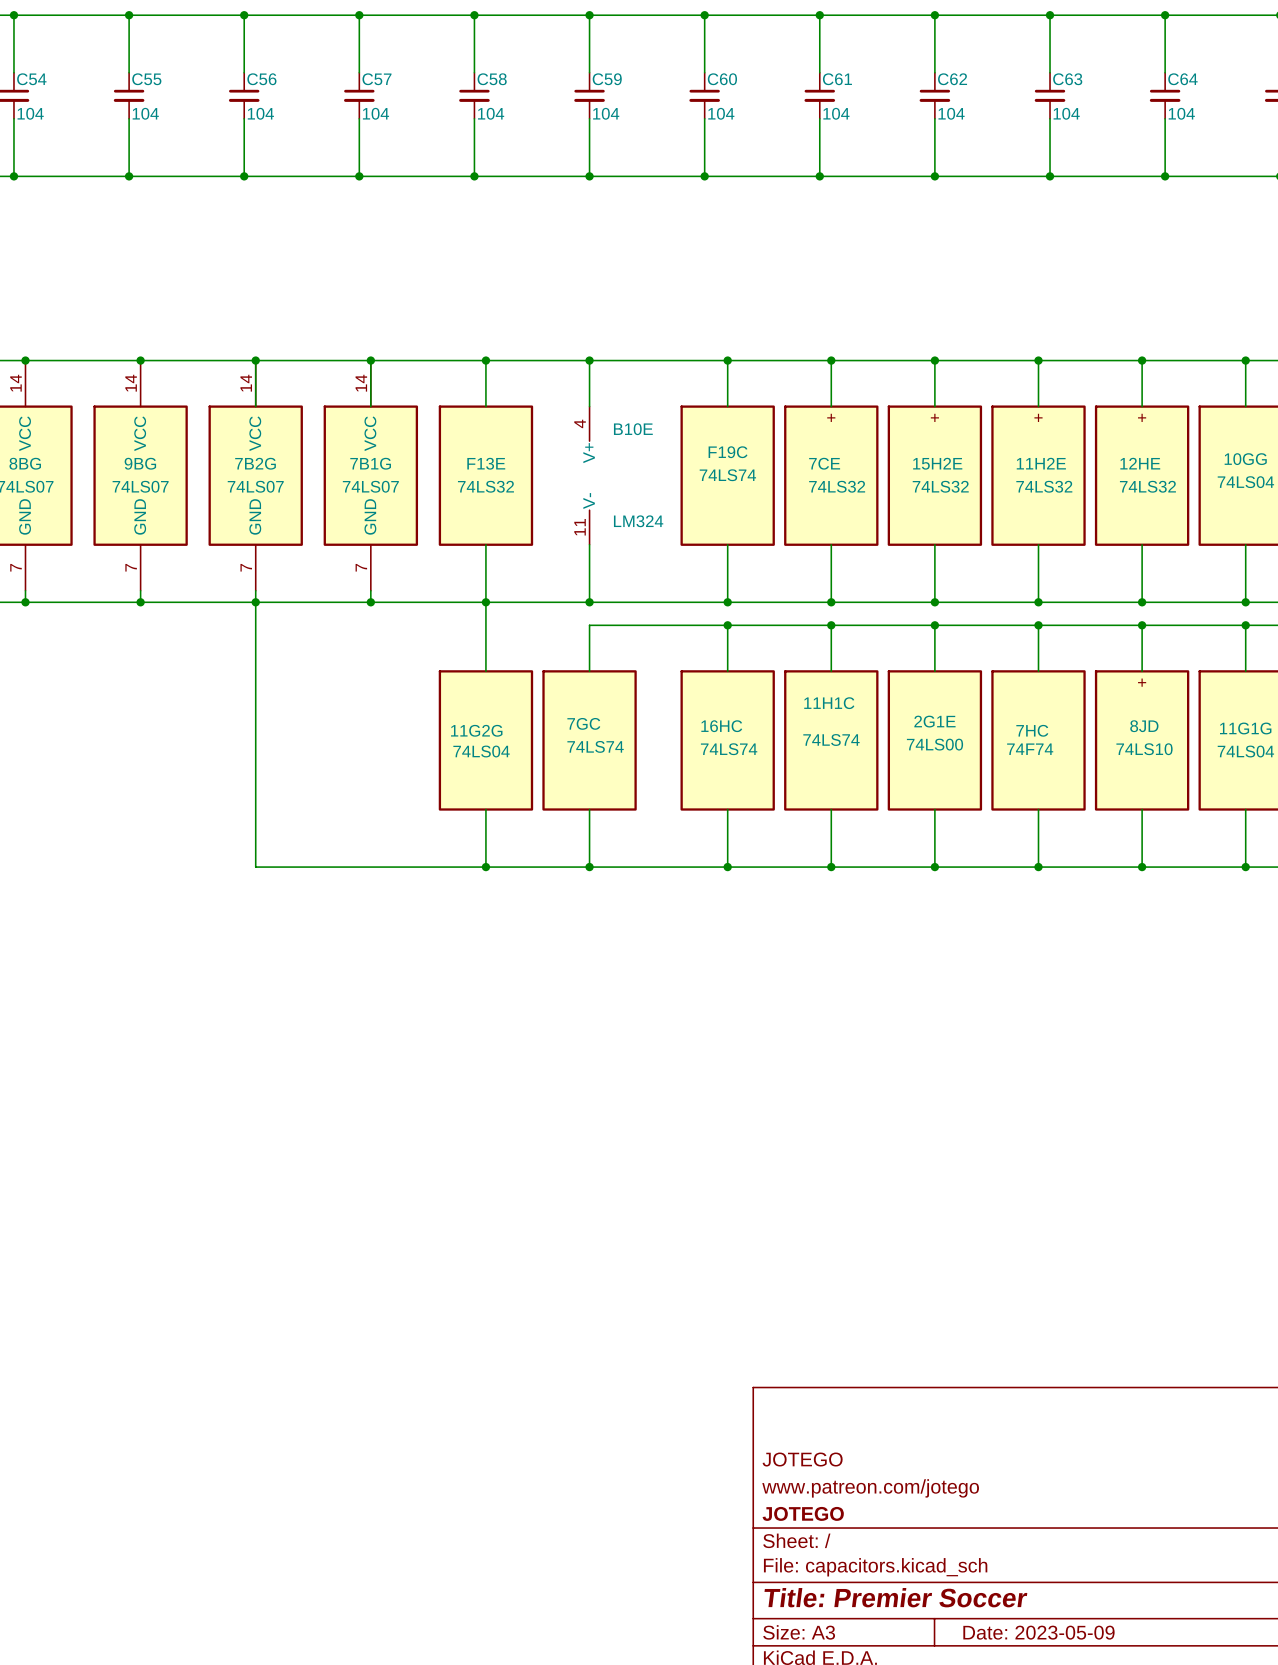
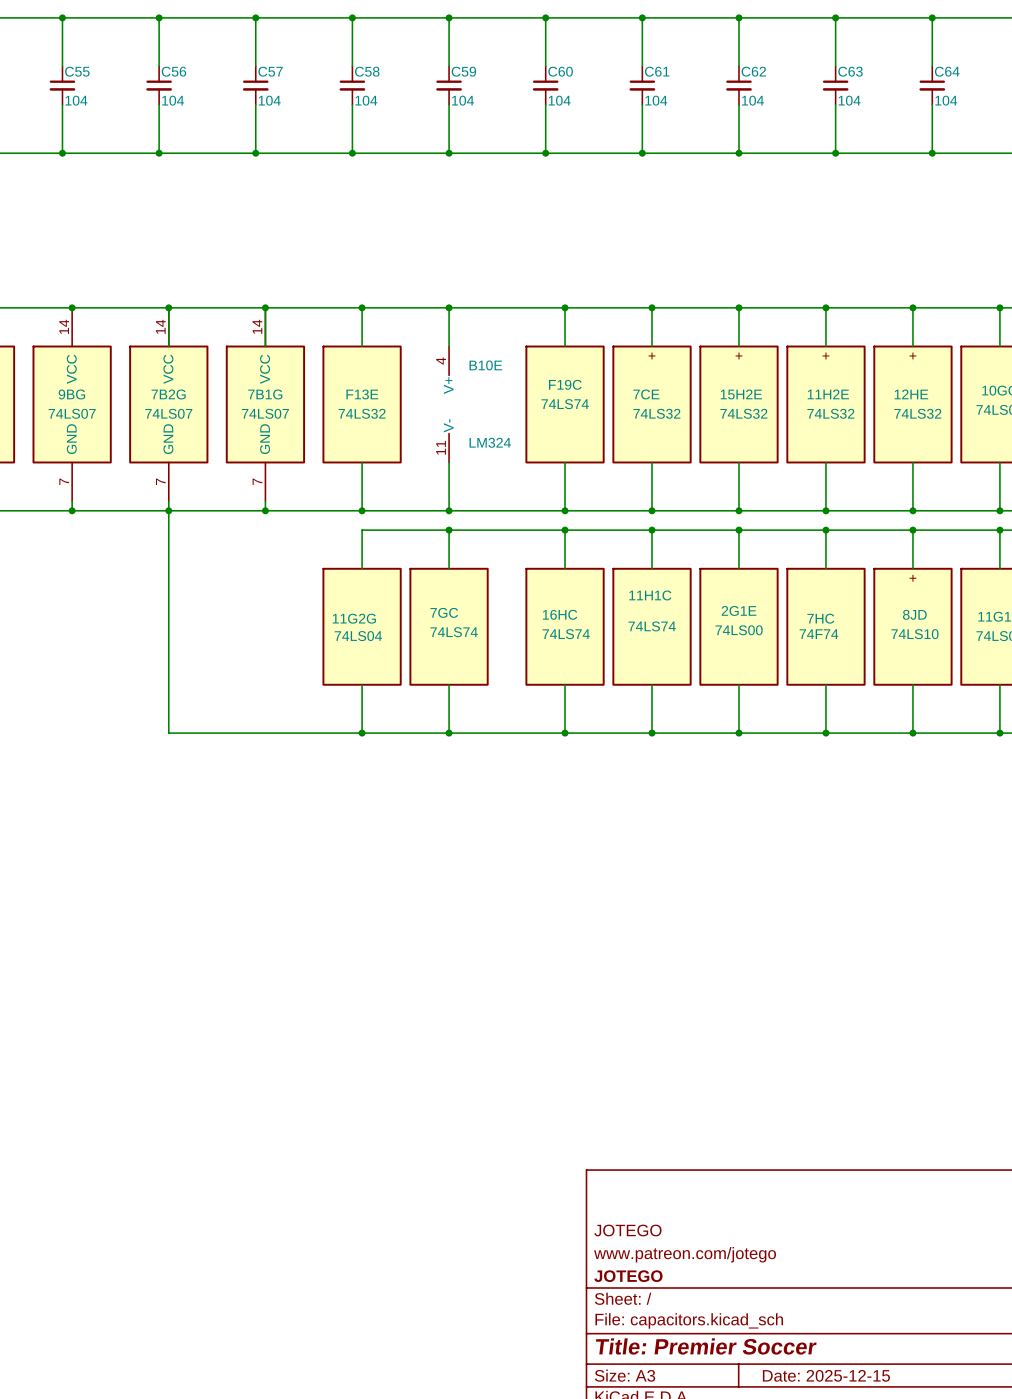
wire: (485, 602) (485, 625) -> (449, 530) (362, 530)
junction: none -> (449, 530)
title block: Date: 2023-05-09 (1038, 1632) -> Date: 2025-12-15 (826, 1375)

